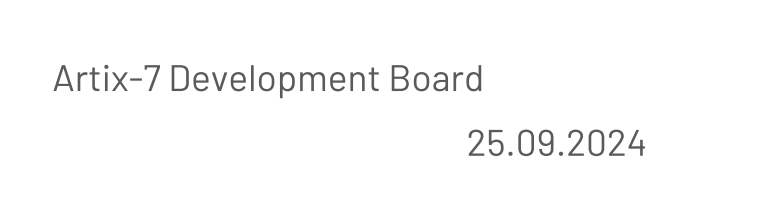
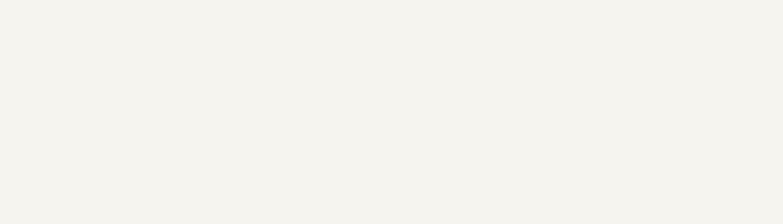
text: Artix-7 Development Board (267, 81) -> none
text: 25.09.2024 (556, 142) -> none

